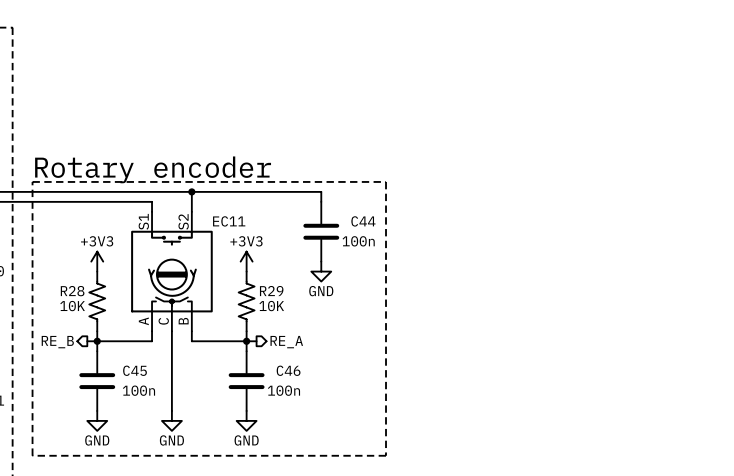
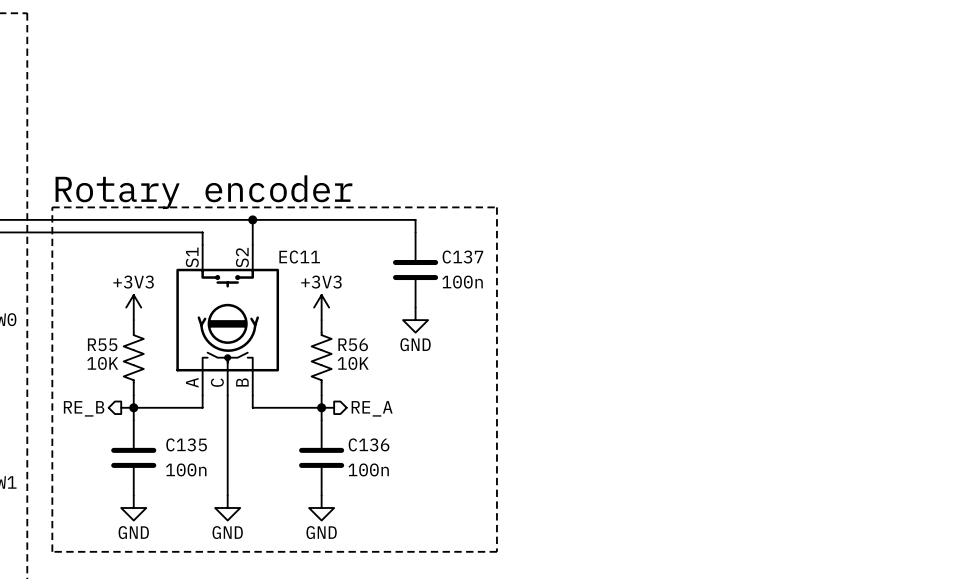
C44 name: C44 (363, 221) -> C137 (462, 257)
R28 name: R28 (72, 291) -> R55 (102, 344)
R29 name: R29 (271, 291) -> R56 (353, 344)
C45 name: C45 (135, 370) -> C135 (186, 444)
C46 name: C46 (288, 370) -> C136 (369, 444)

